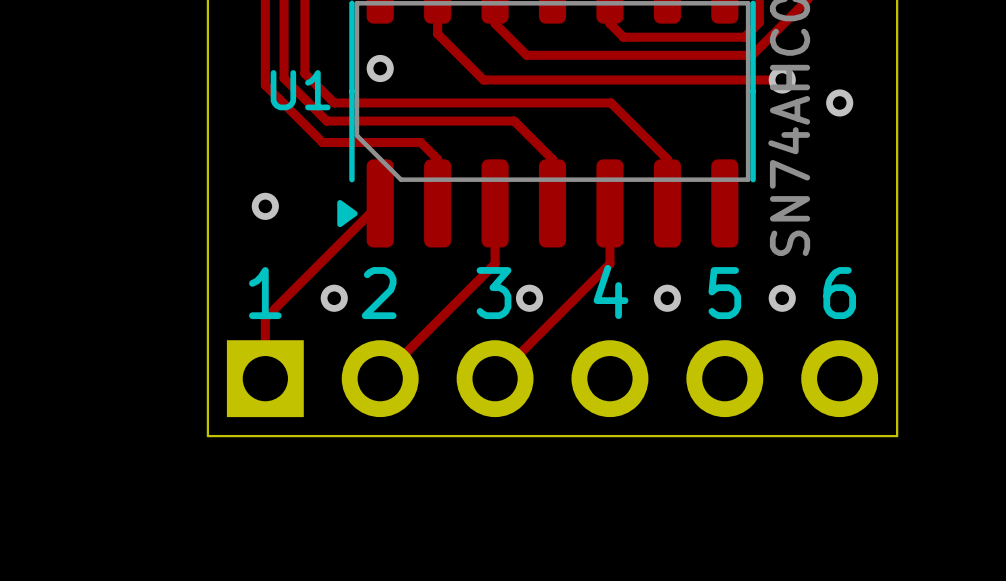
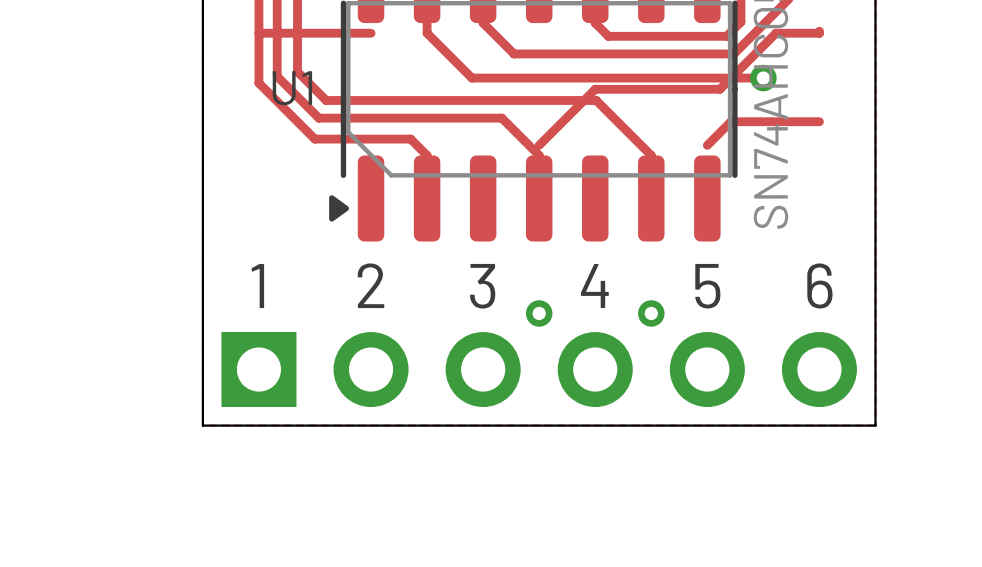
track: none -> (819, 31) (819, 33) (776, 33) (719, 89) (595, 89) (539, 145)
track: none -> (258, 33) (371, 33)
via: (380, 68) -> none
via: (839, 102) -> none
track: none -> (819, 121) (730, 121) (707, 145)
track: (380, 203) (265, 318) (265, 378) -> none
track: (495, 203) (495, 263) (380, 378) -> none
track: (609, 203) (609, 263) (495, 378) -> none
via: (265, 206) -> none
via: (334, 298) -> none
via position: (529, 298) -> (539, 313)
via position: (667, 298) -> (651, 313)
via: (782, 298) -> none

